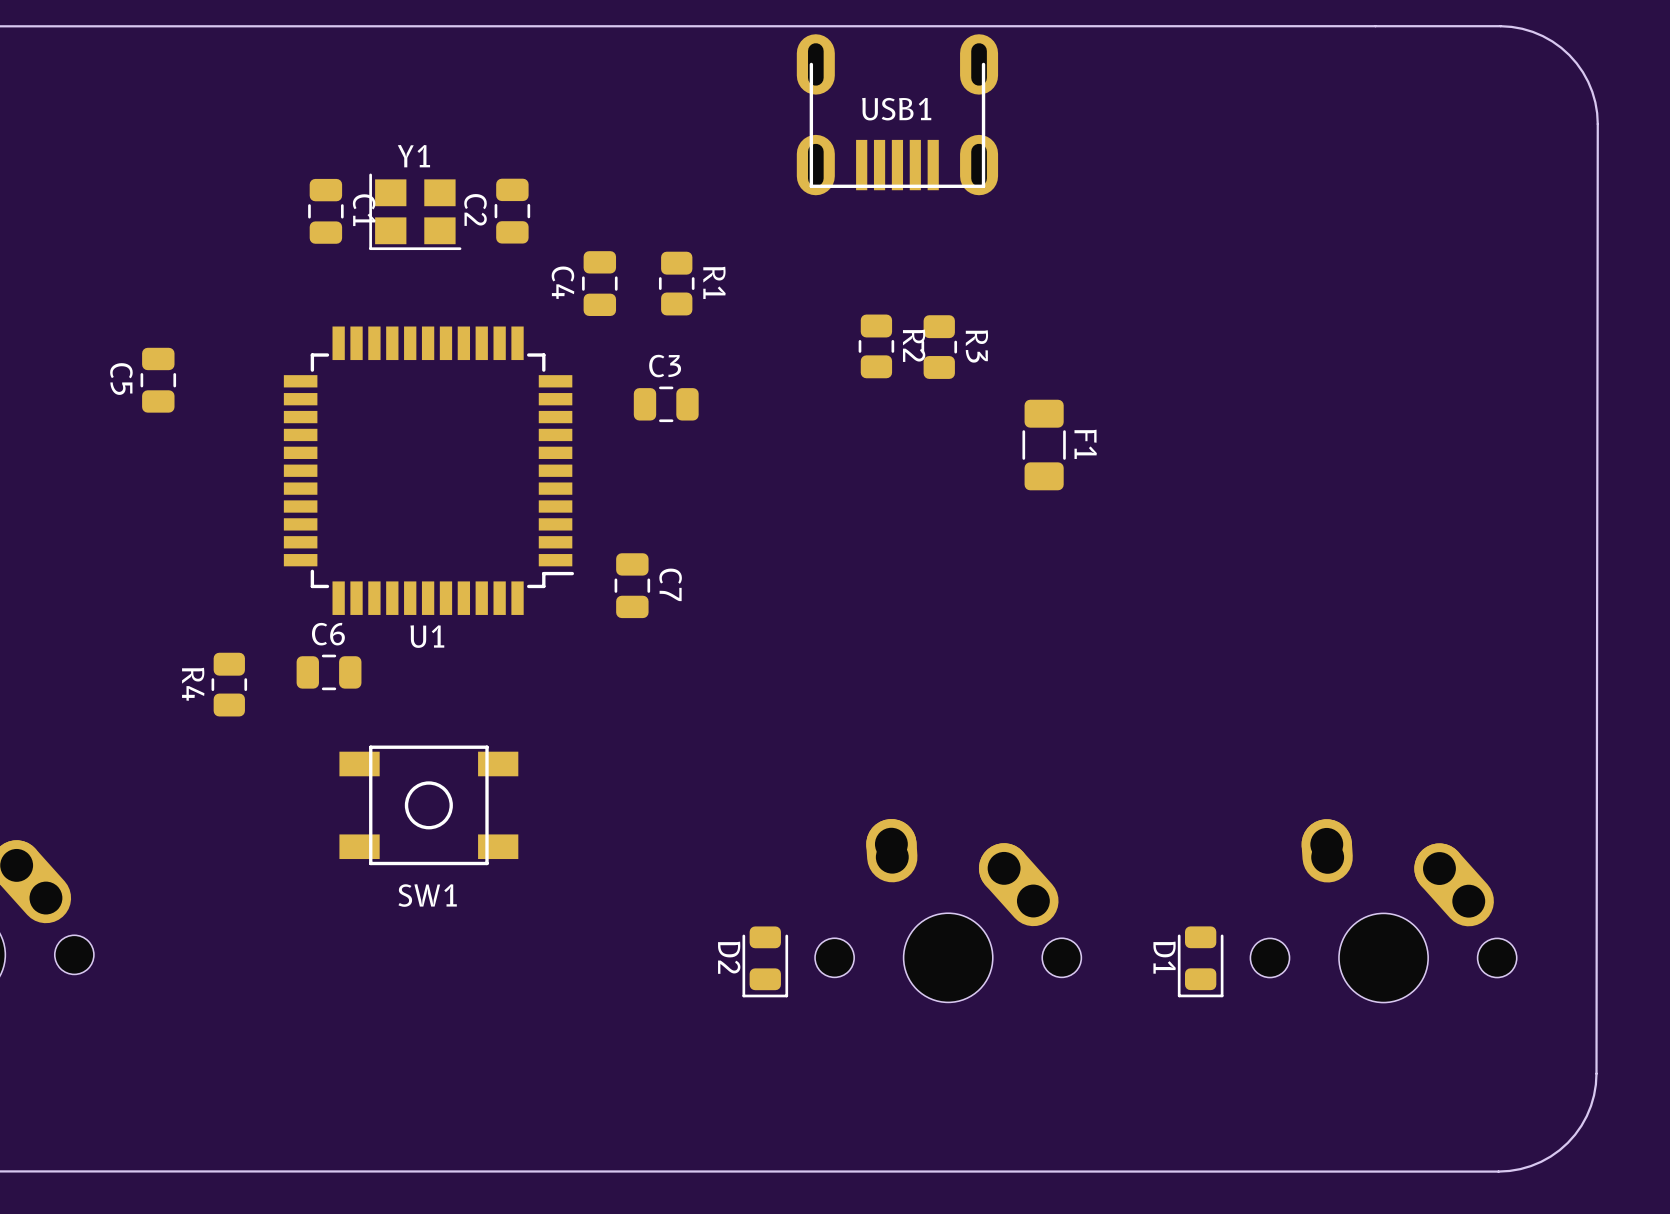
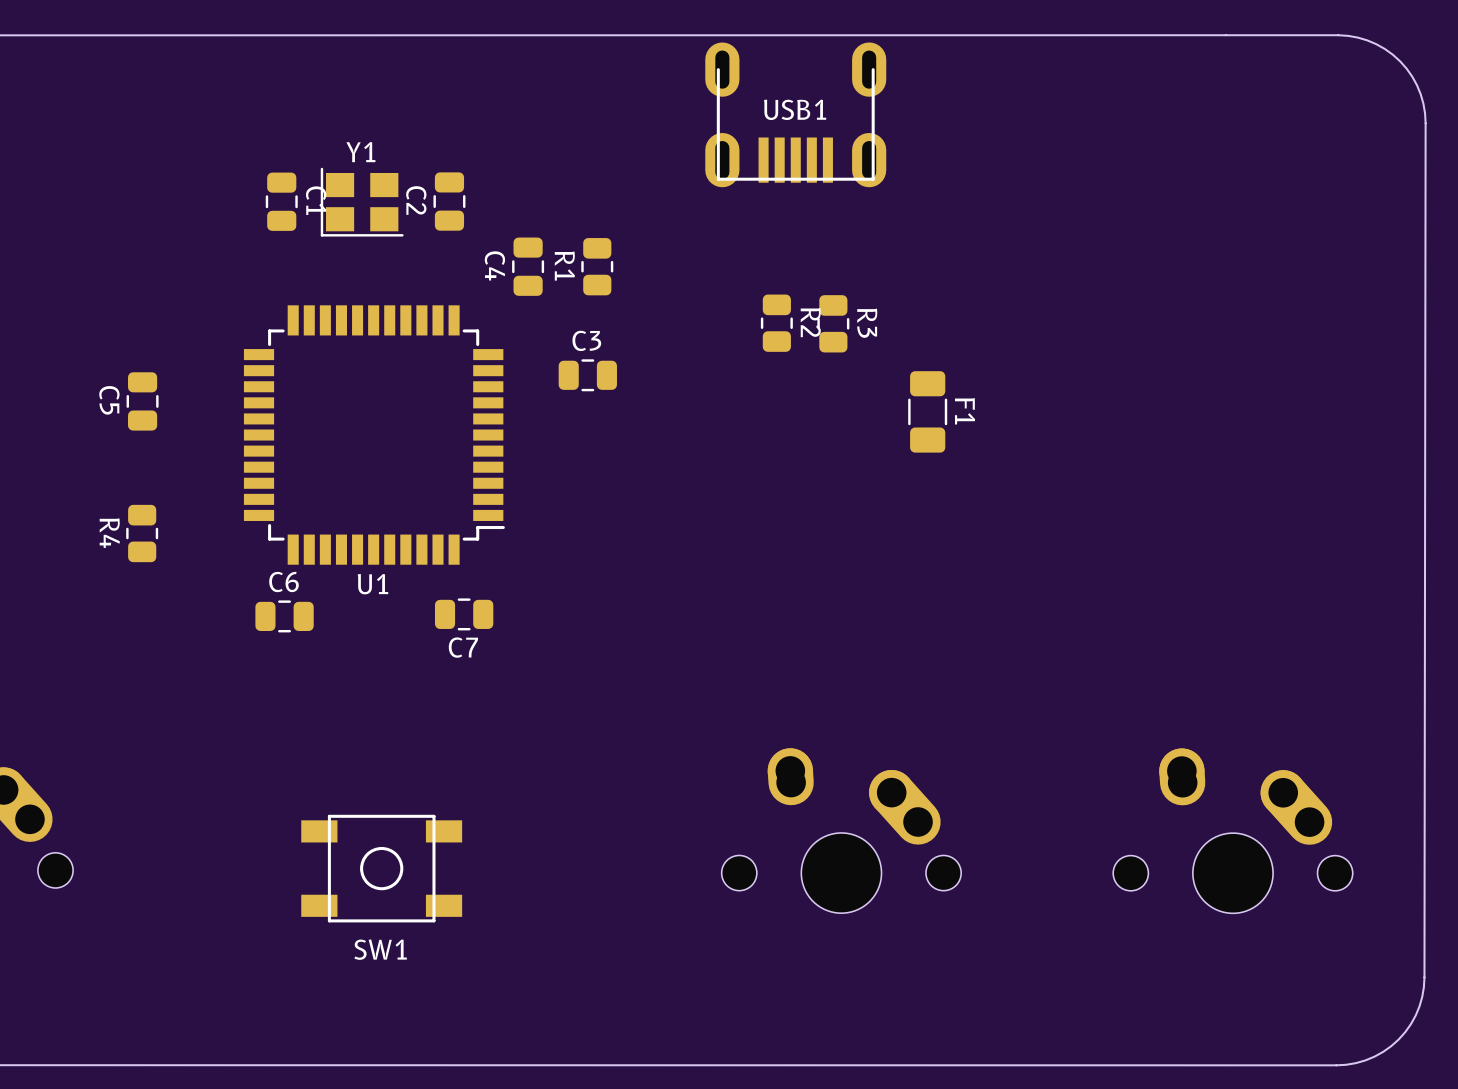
R1 name position: R1 (714, 282) -> R1 (564, 266)
C5 position: (158, 380) -> (142, 401)
C7 rotation: 0° (632, 585) -> 90° clockwise (464, 614)
C7 position: (632, 585) -> (464, 614)
R4 position: (229, 684) -> (142, 533)
SW1 position: (428, 805) -> (381, 868)
D2: (765, 961) -> none
D1: (1200, 961) -> none

